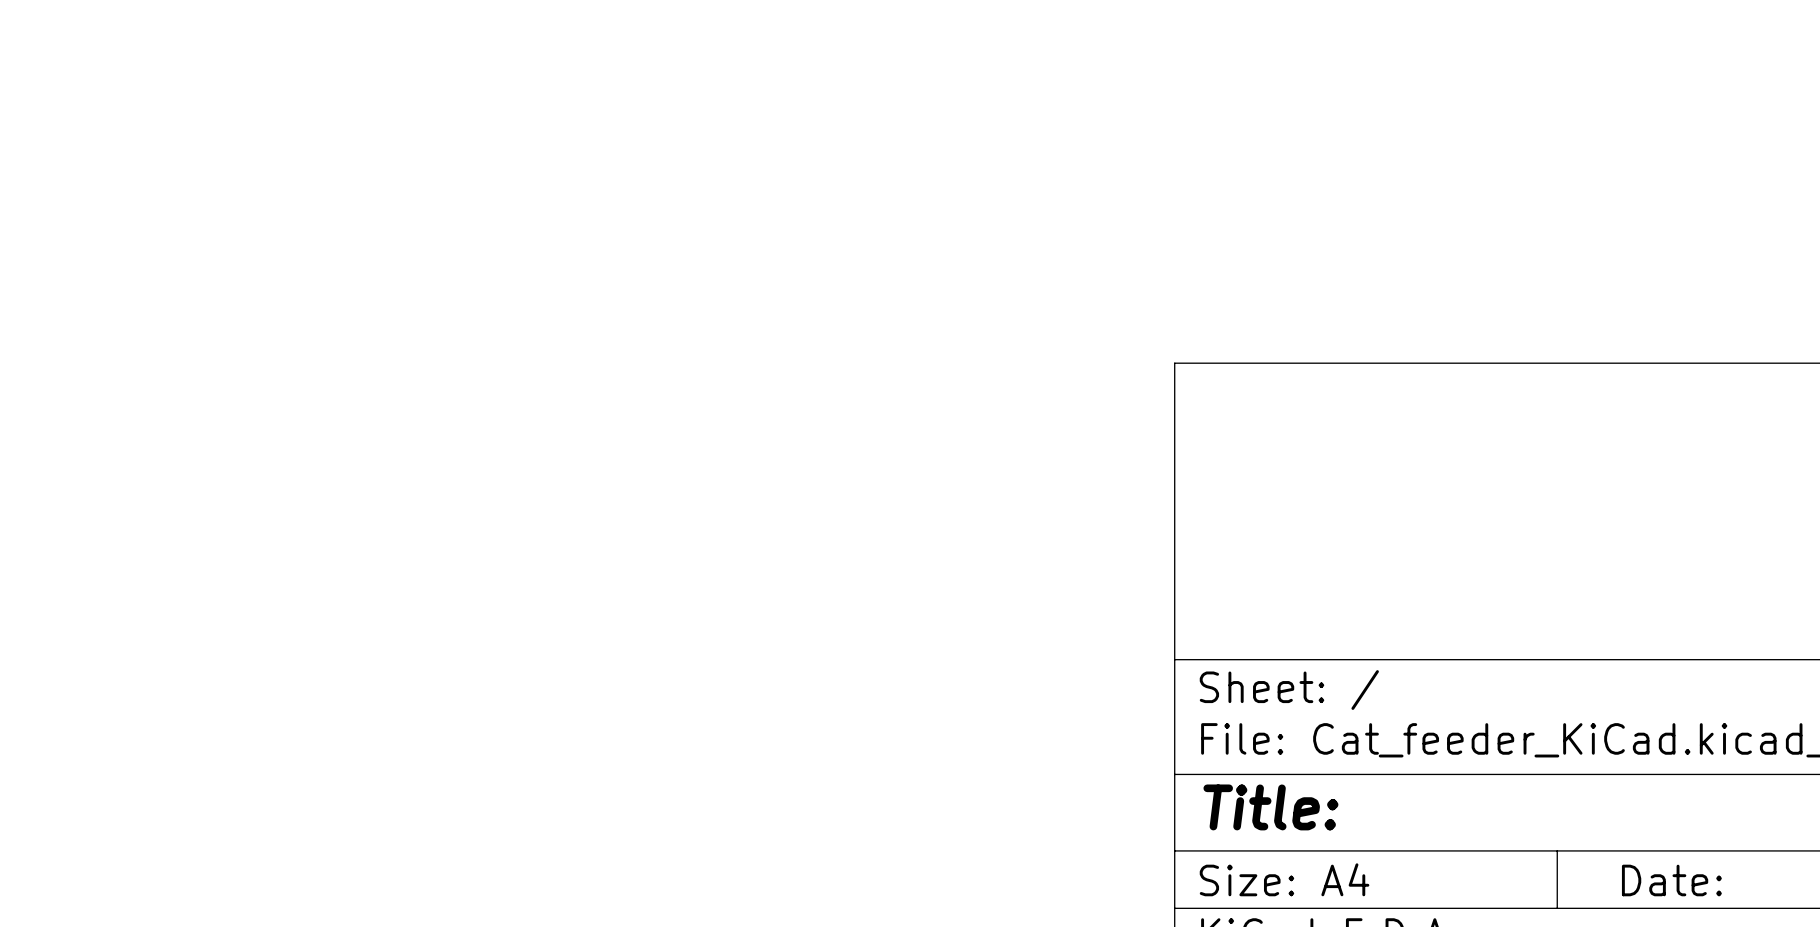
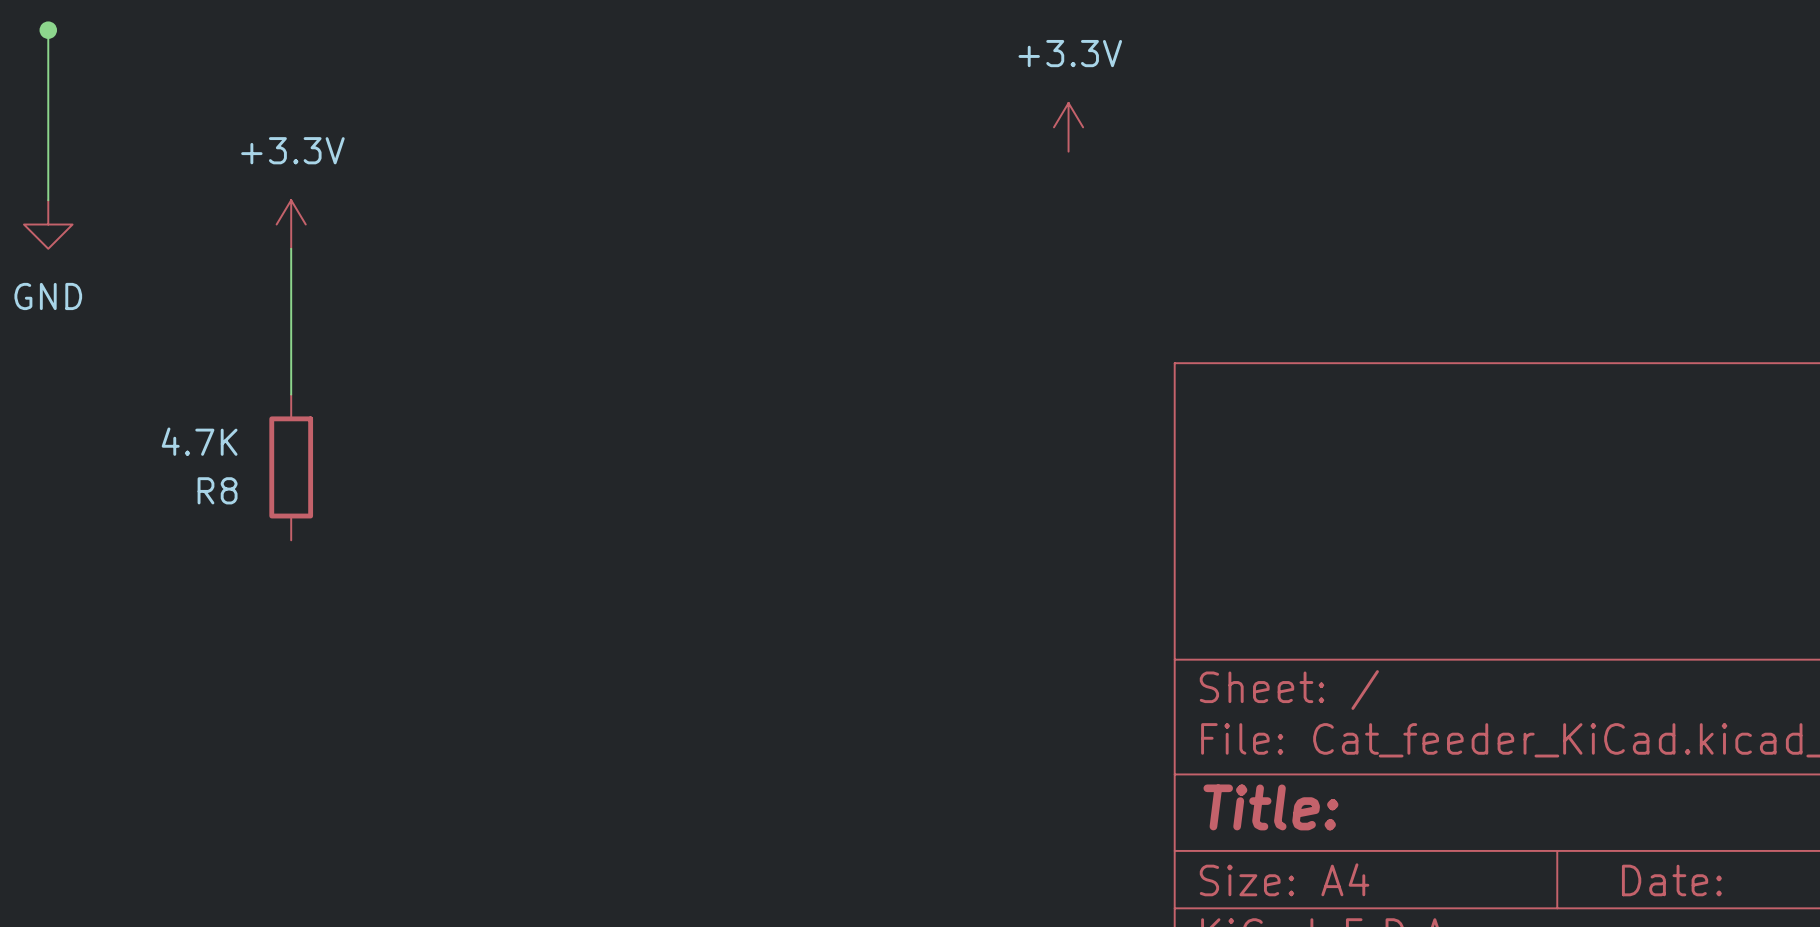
wire: none -> (48, 30) (48, 200)
junction: none -> (48, 30)
power symbol: none -> +3.3V (1068, 127)
power symbol: none -> GND (48, 224)
power symbol: none -> +3.3V (291, 224)
wire: none -> (291, 248) (291, 394)
R8: none -> 4.7K (291, 467)

